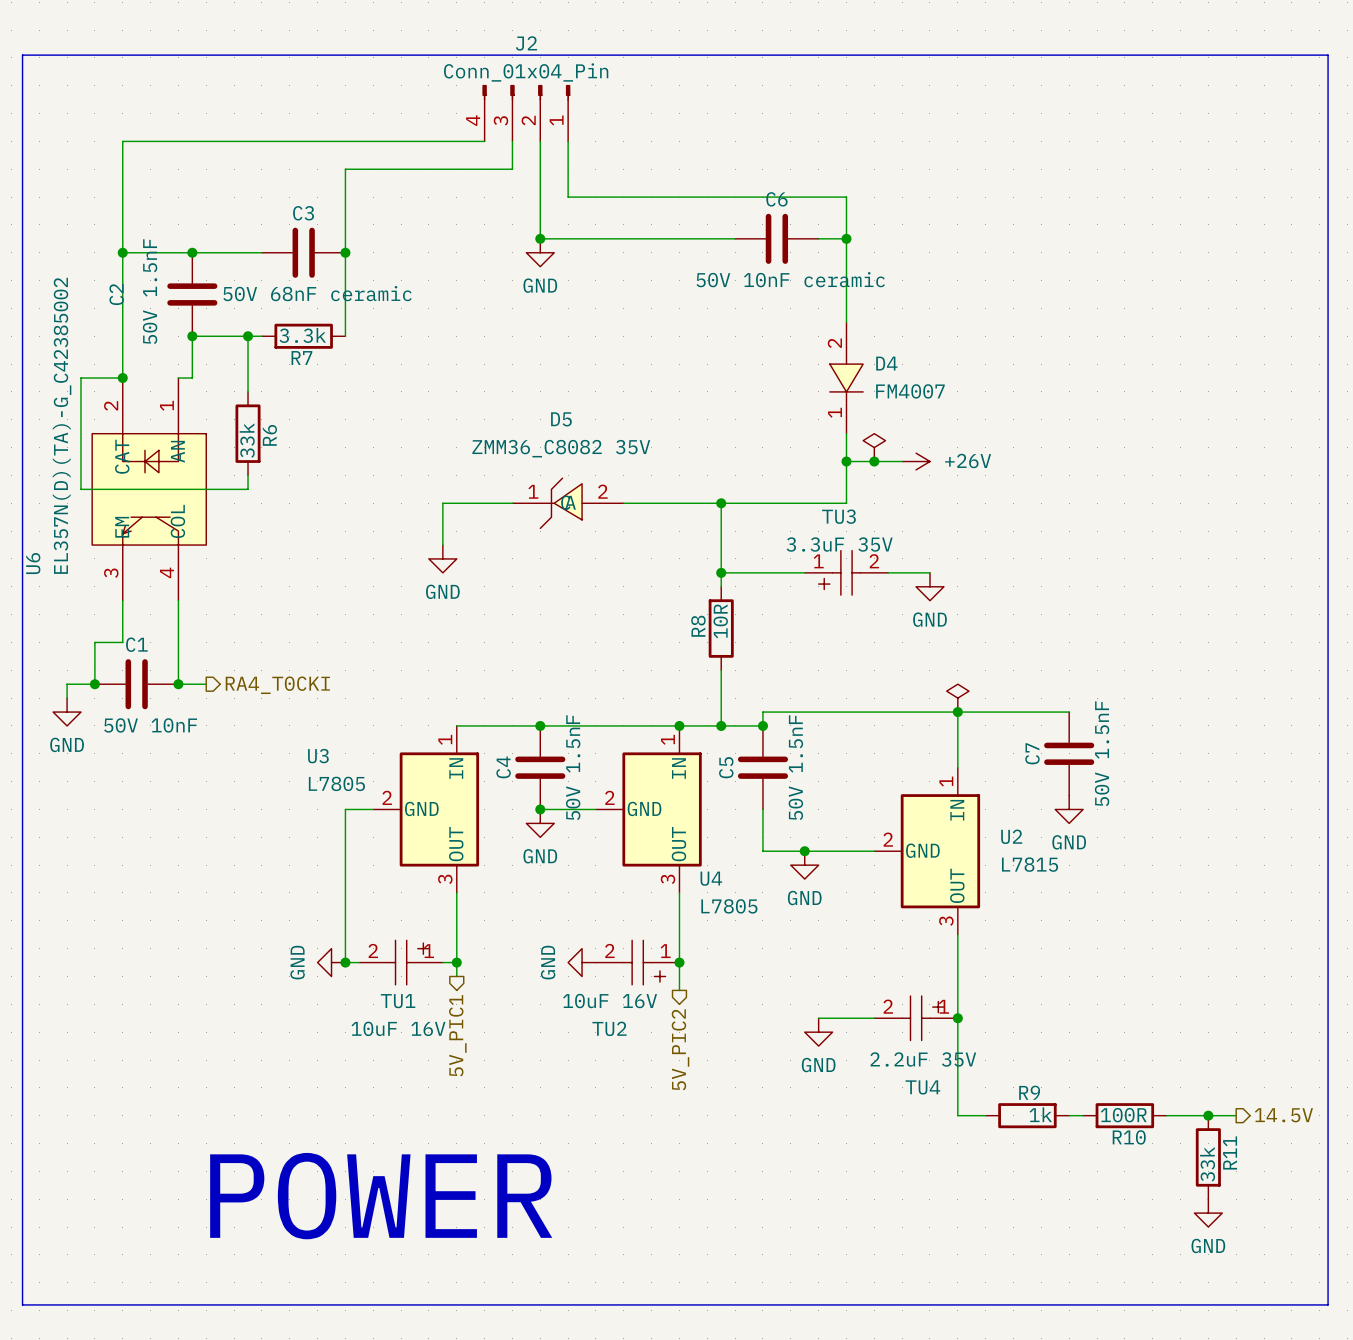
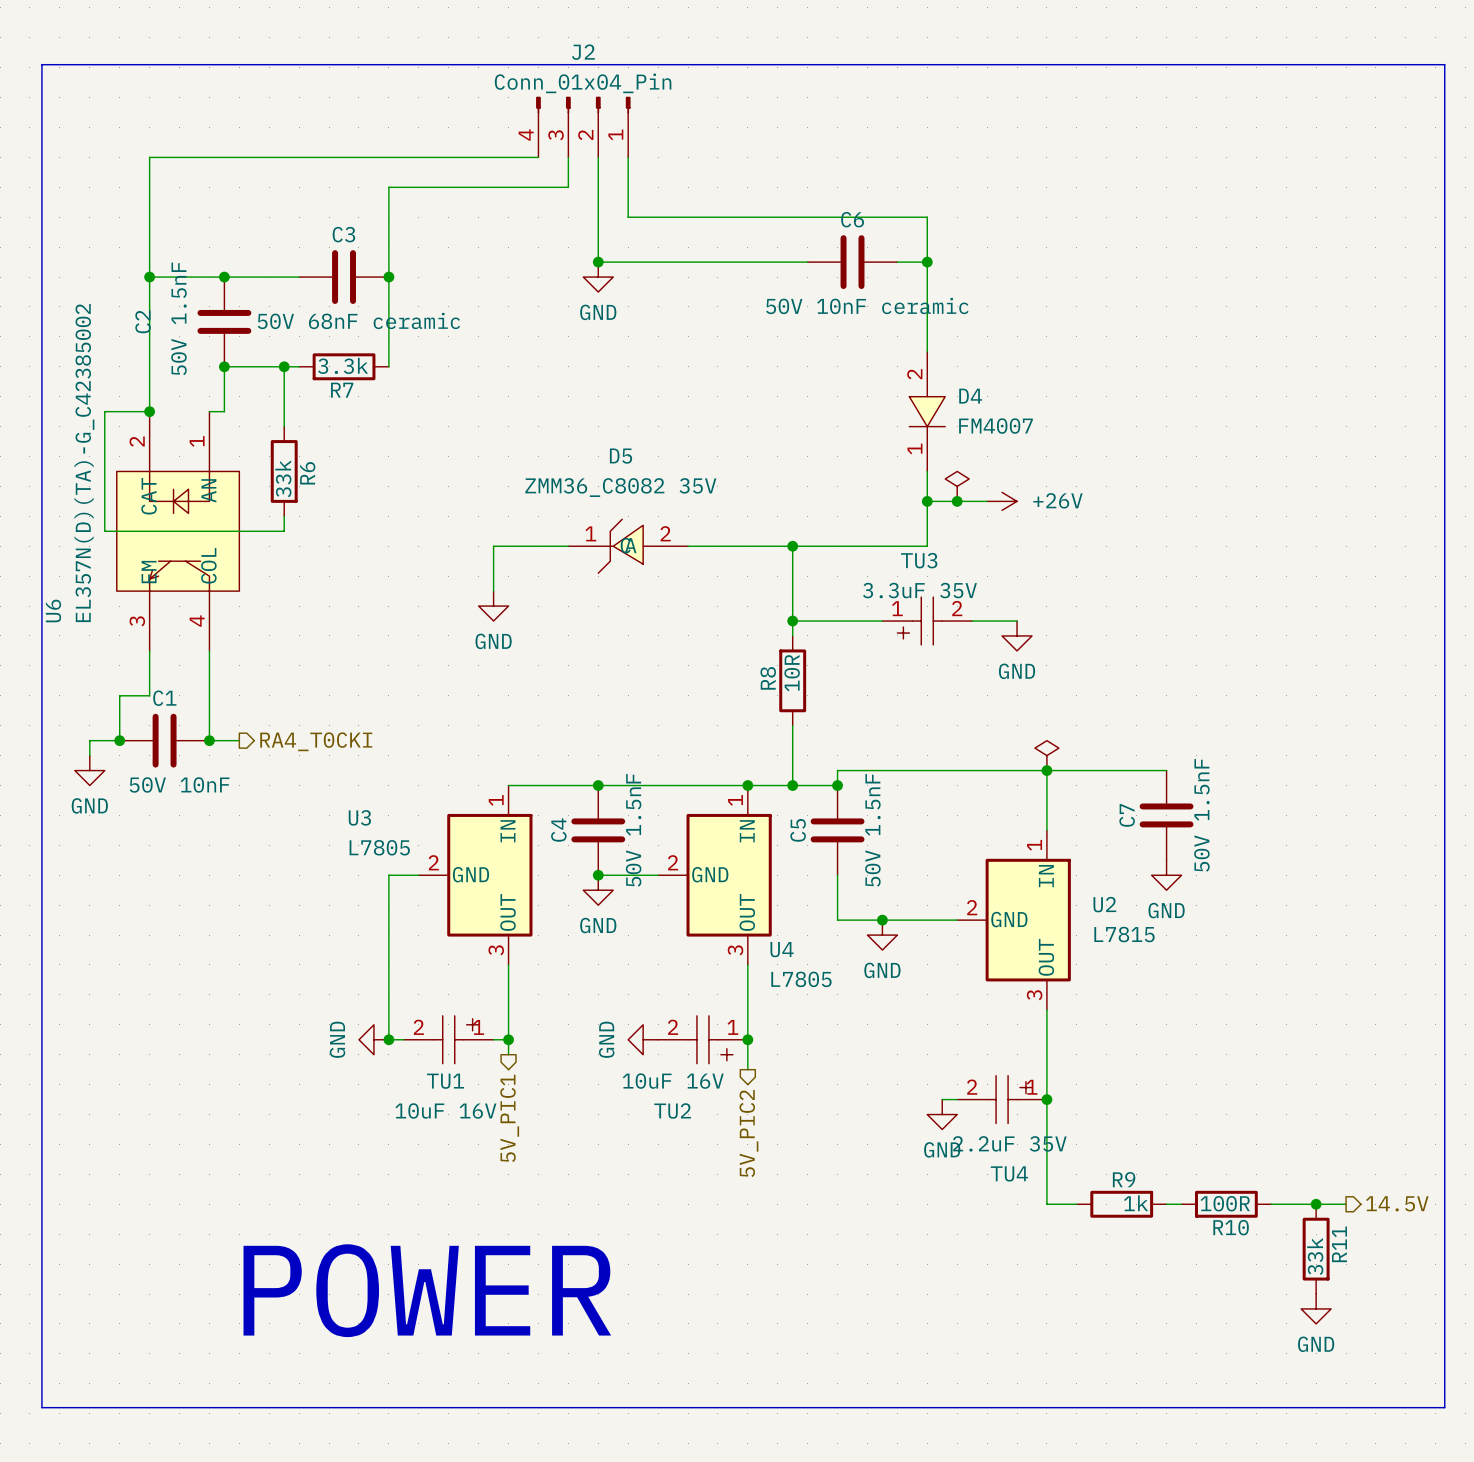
wire: (818, 1018) (860, 1018) -> none
power symbol position: GND (818, 1032) -> GND (942, 1114)

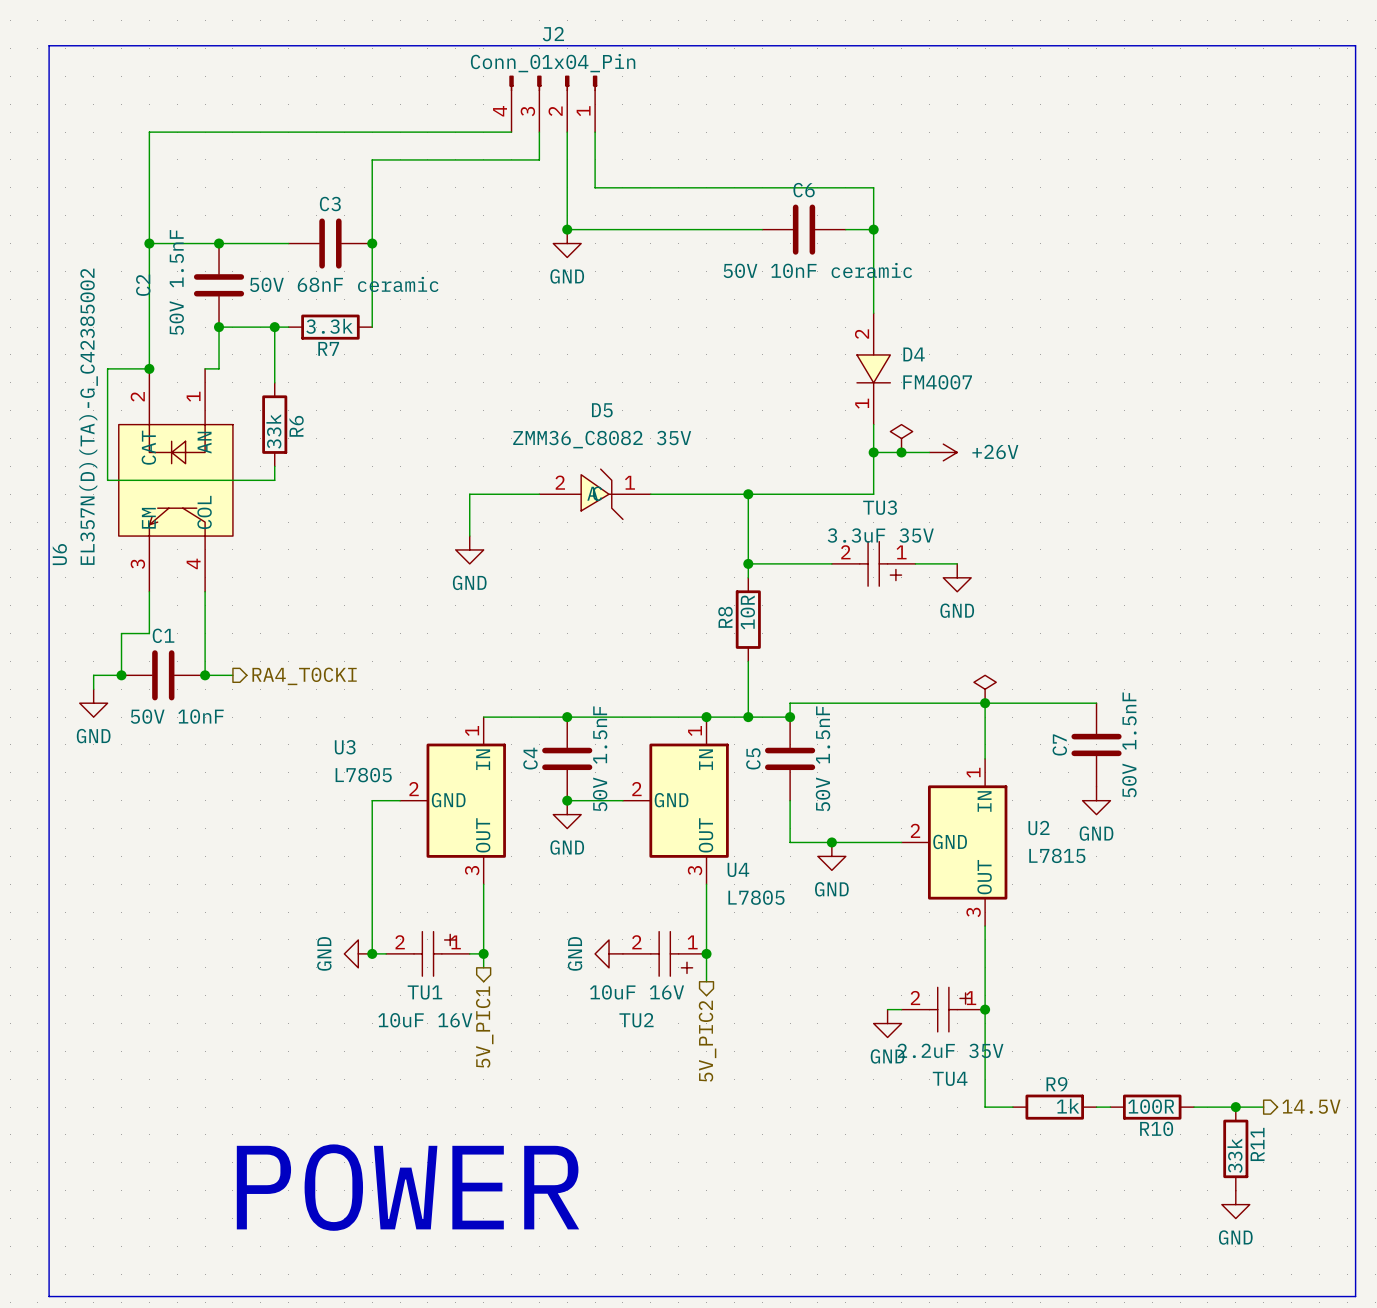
D5 flip: as is (620, 546) -> left-right (602, 494)
TU3 flip: as is (919, 621) -> left-right (880, 563)

